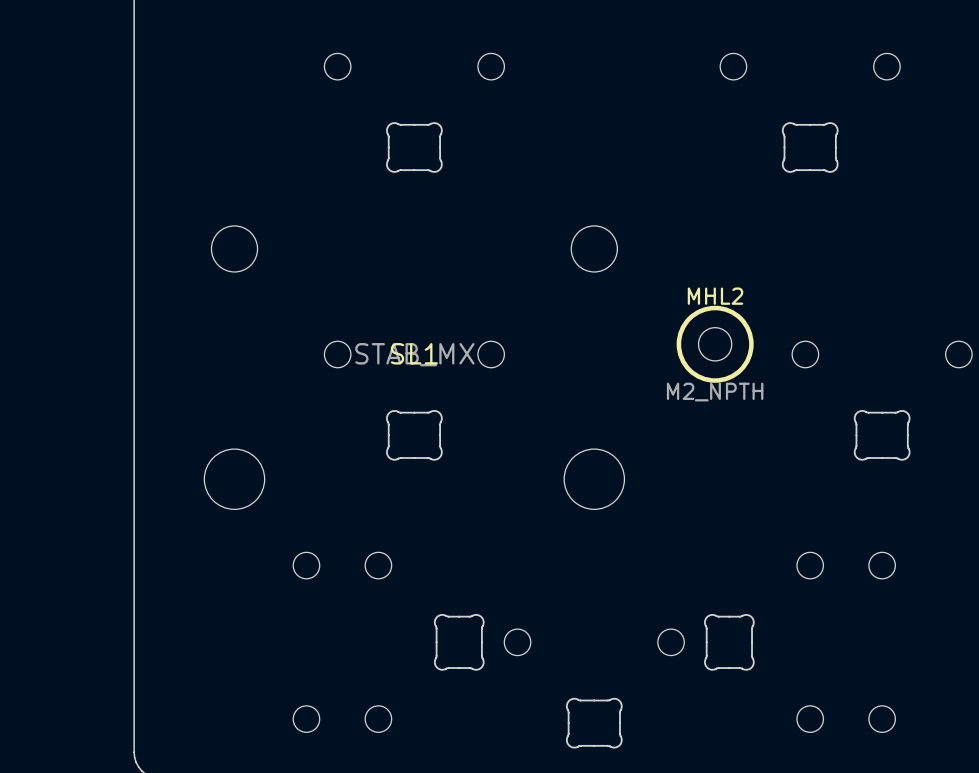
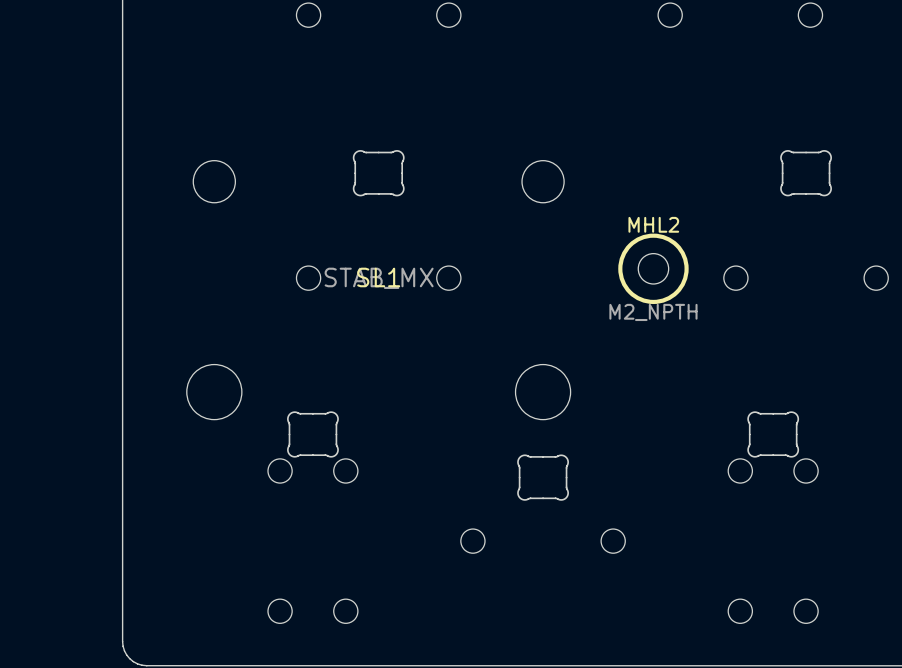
part position: (414, 147) -> (378, 173)
part: (810, 147) -> none
part: none -> (806, 173)
part: (414, 435) -> none
part: (882, 435) -> none
part: none -> (312, 434)
part: none -> (773, 434)
part: none -> (543, 477)
part: (459, 642) -> none
part: (729, 642) -> none
part: (594, 723) -> none

